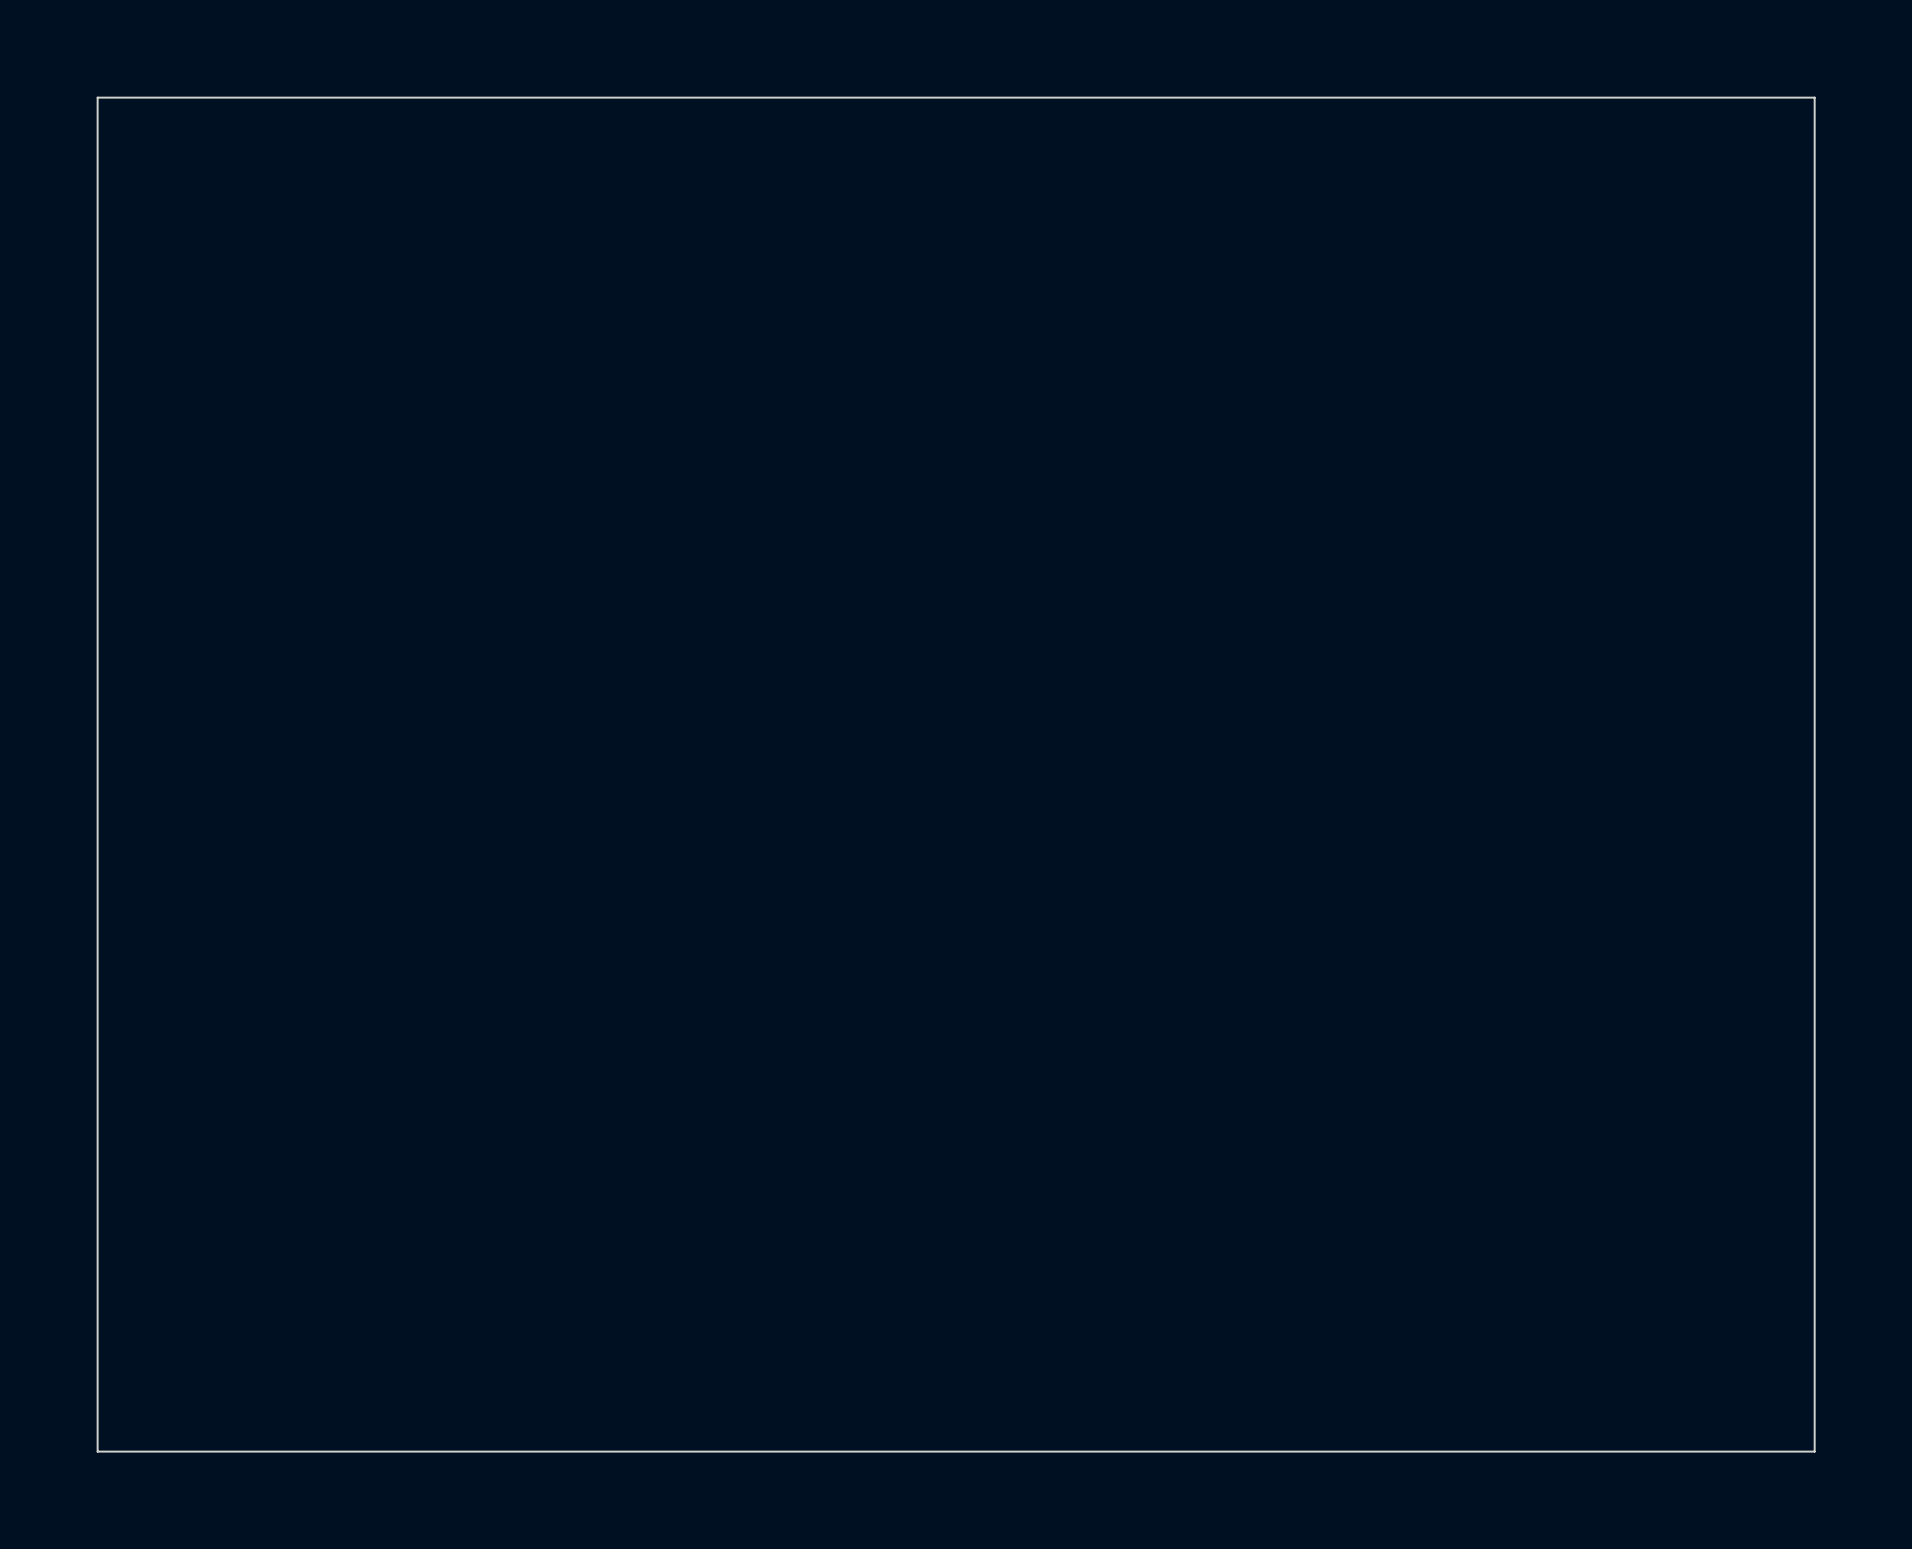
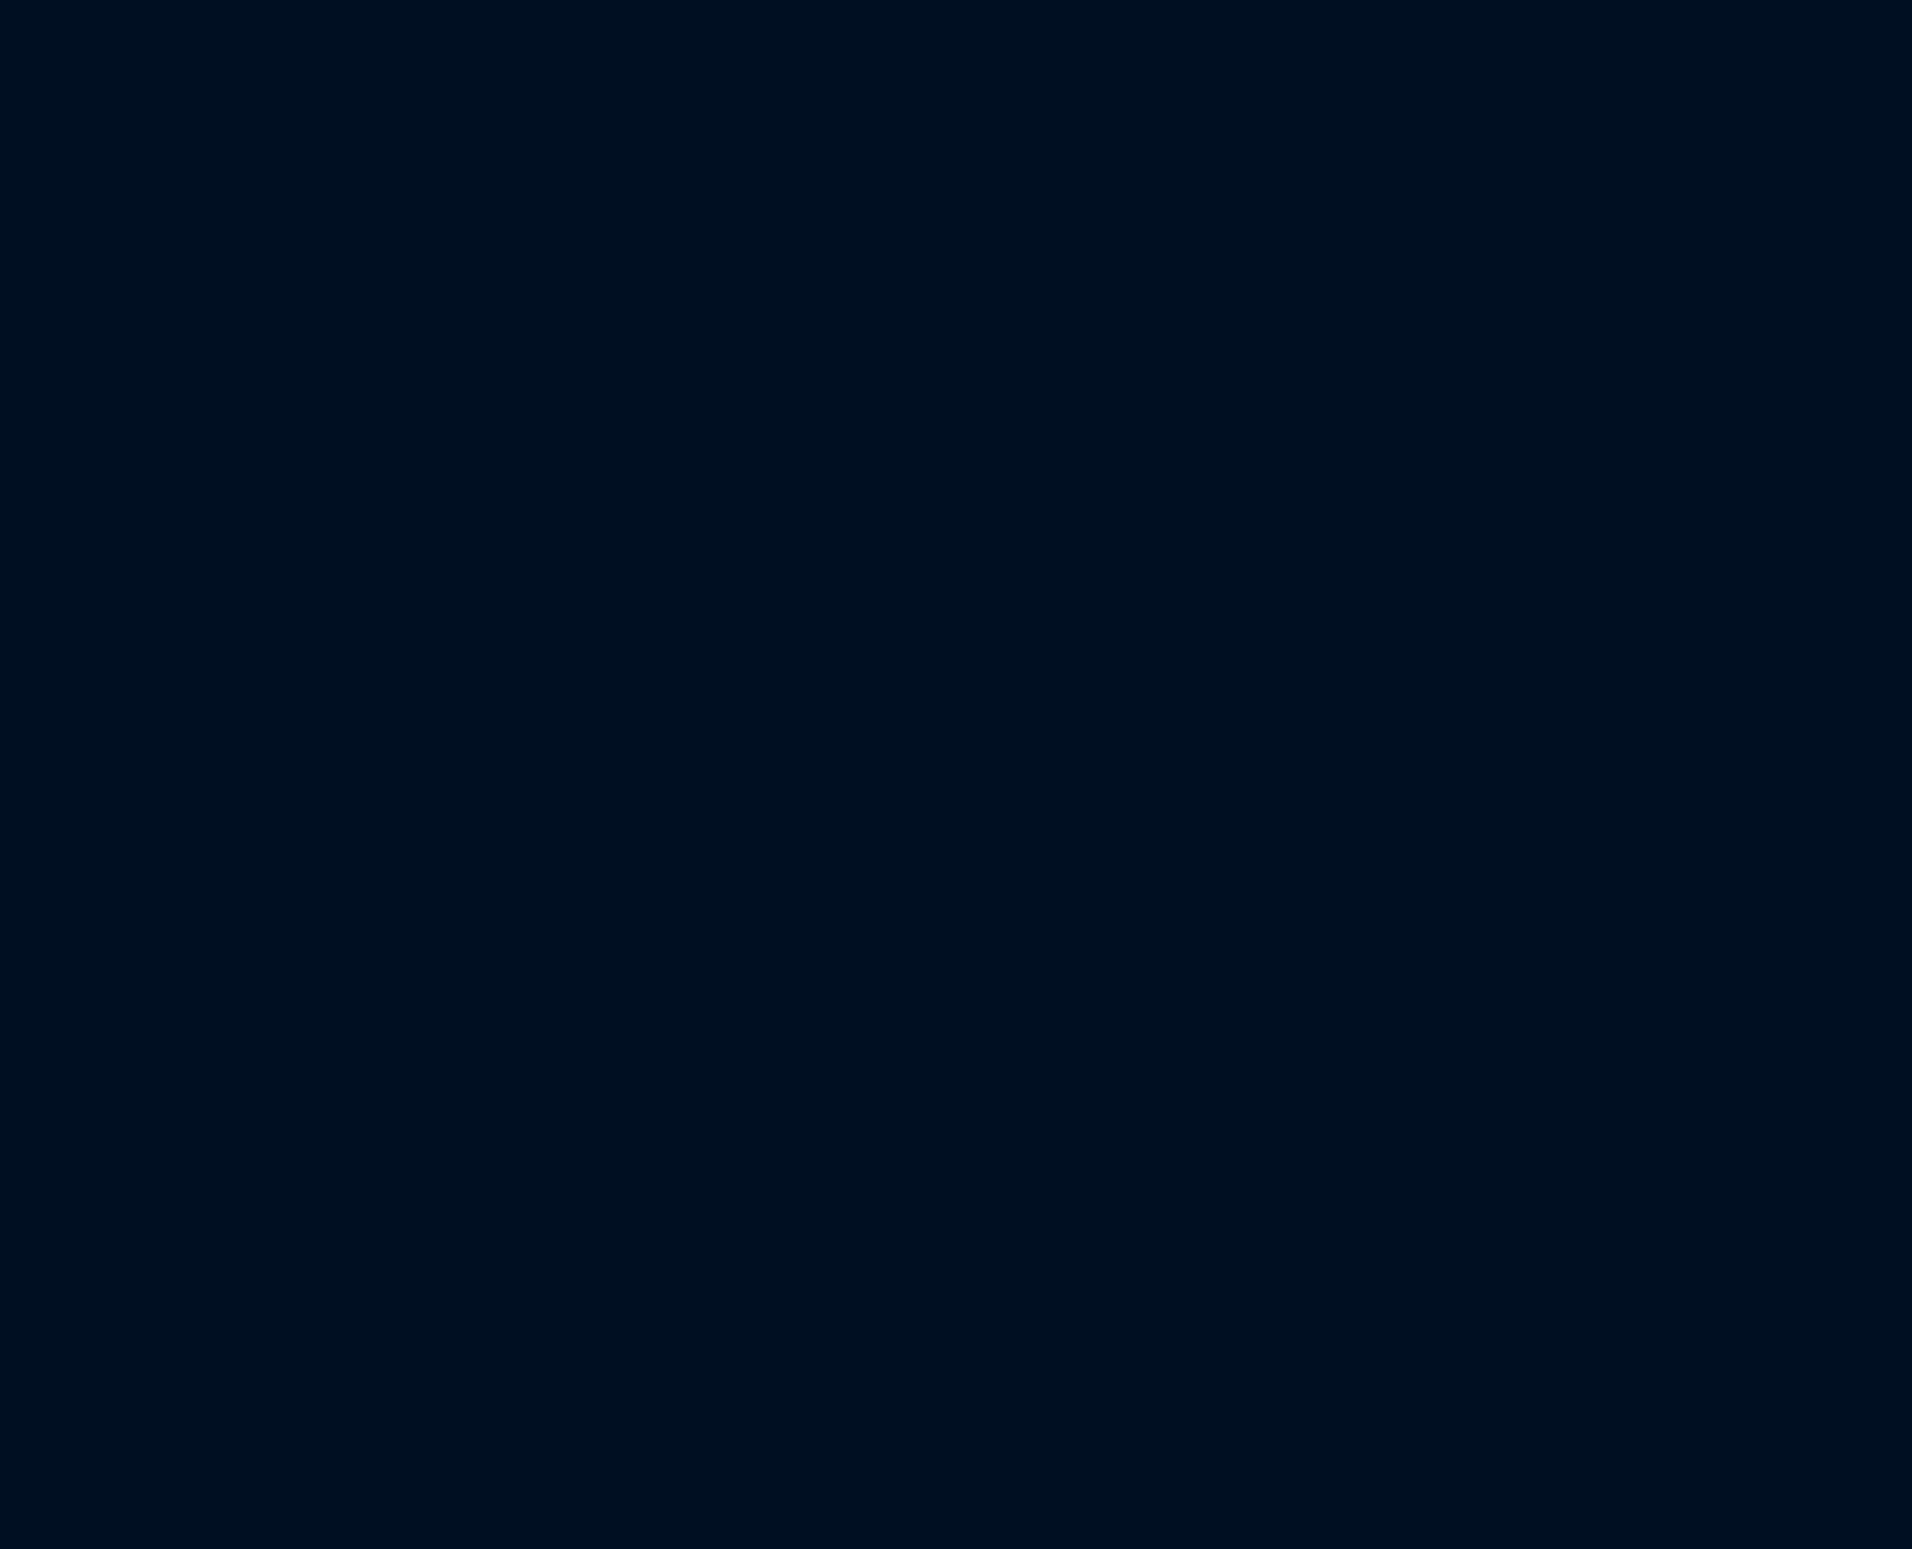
board edge: (1814, 97) (97, 97) (97, 1451) (1814, 1451) (1814, 97) -> none

